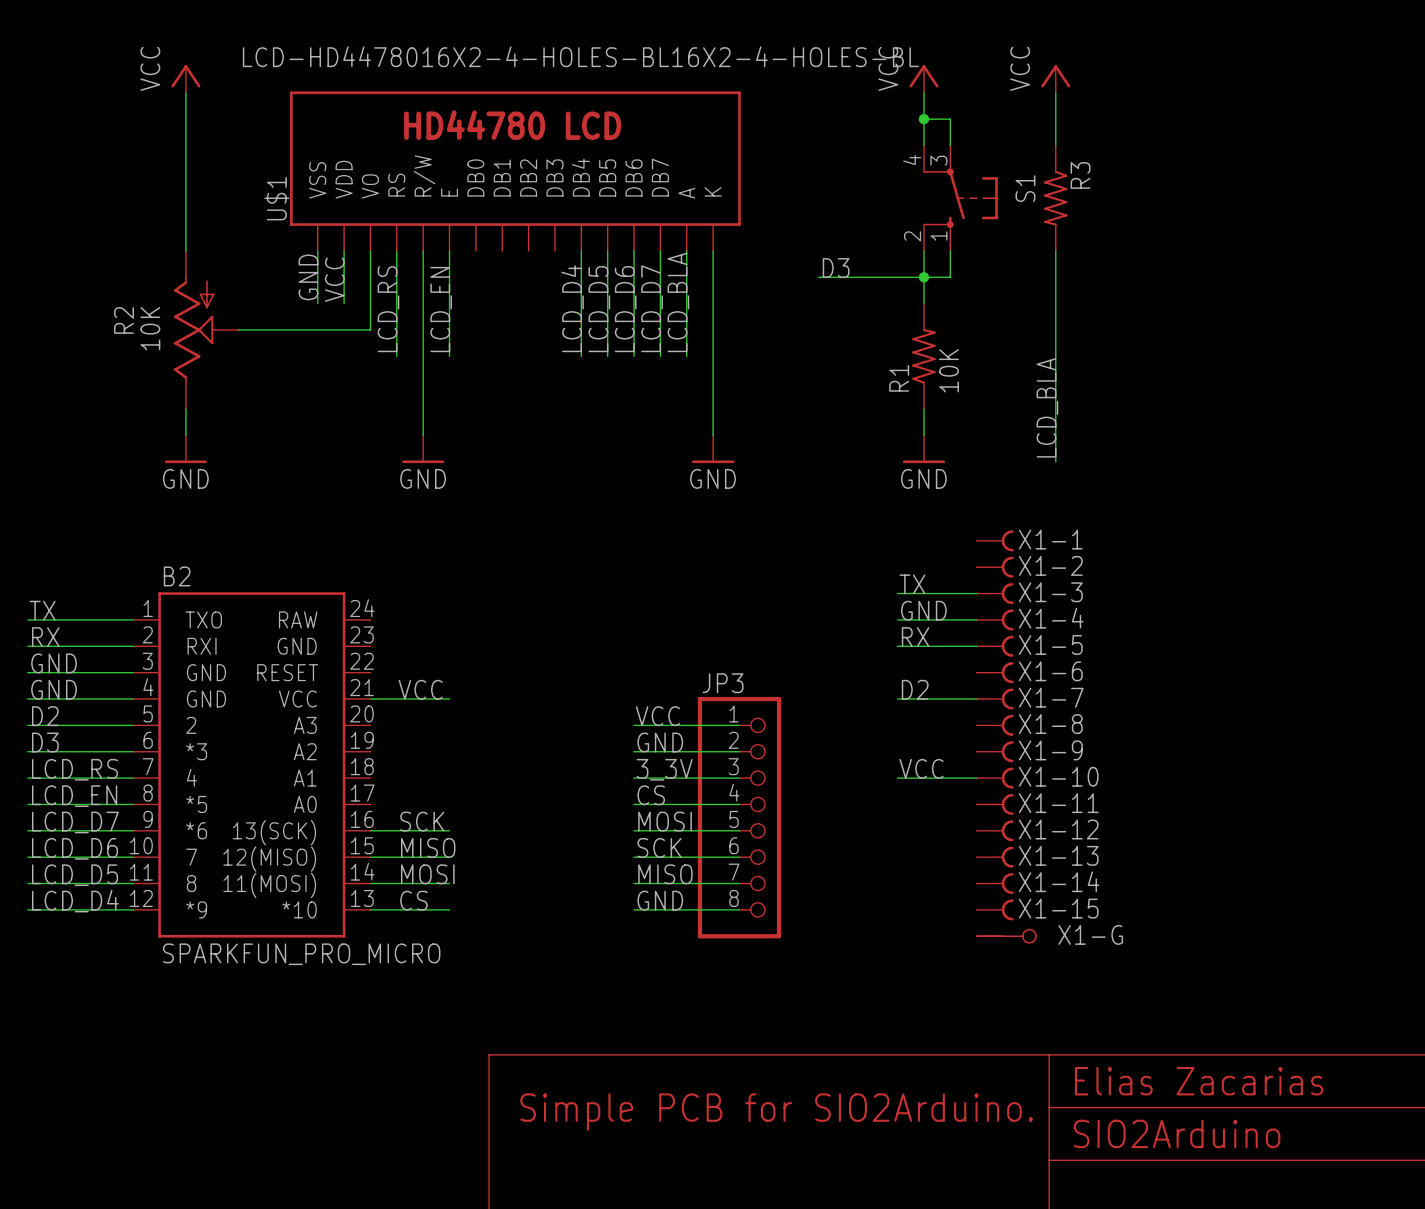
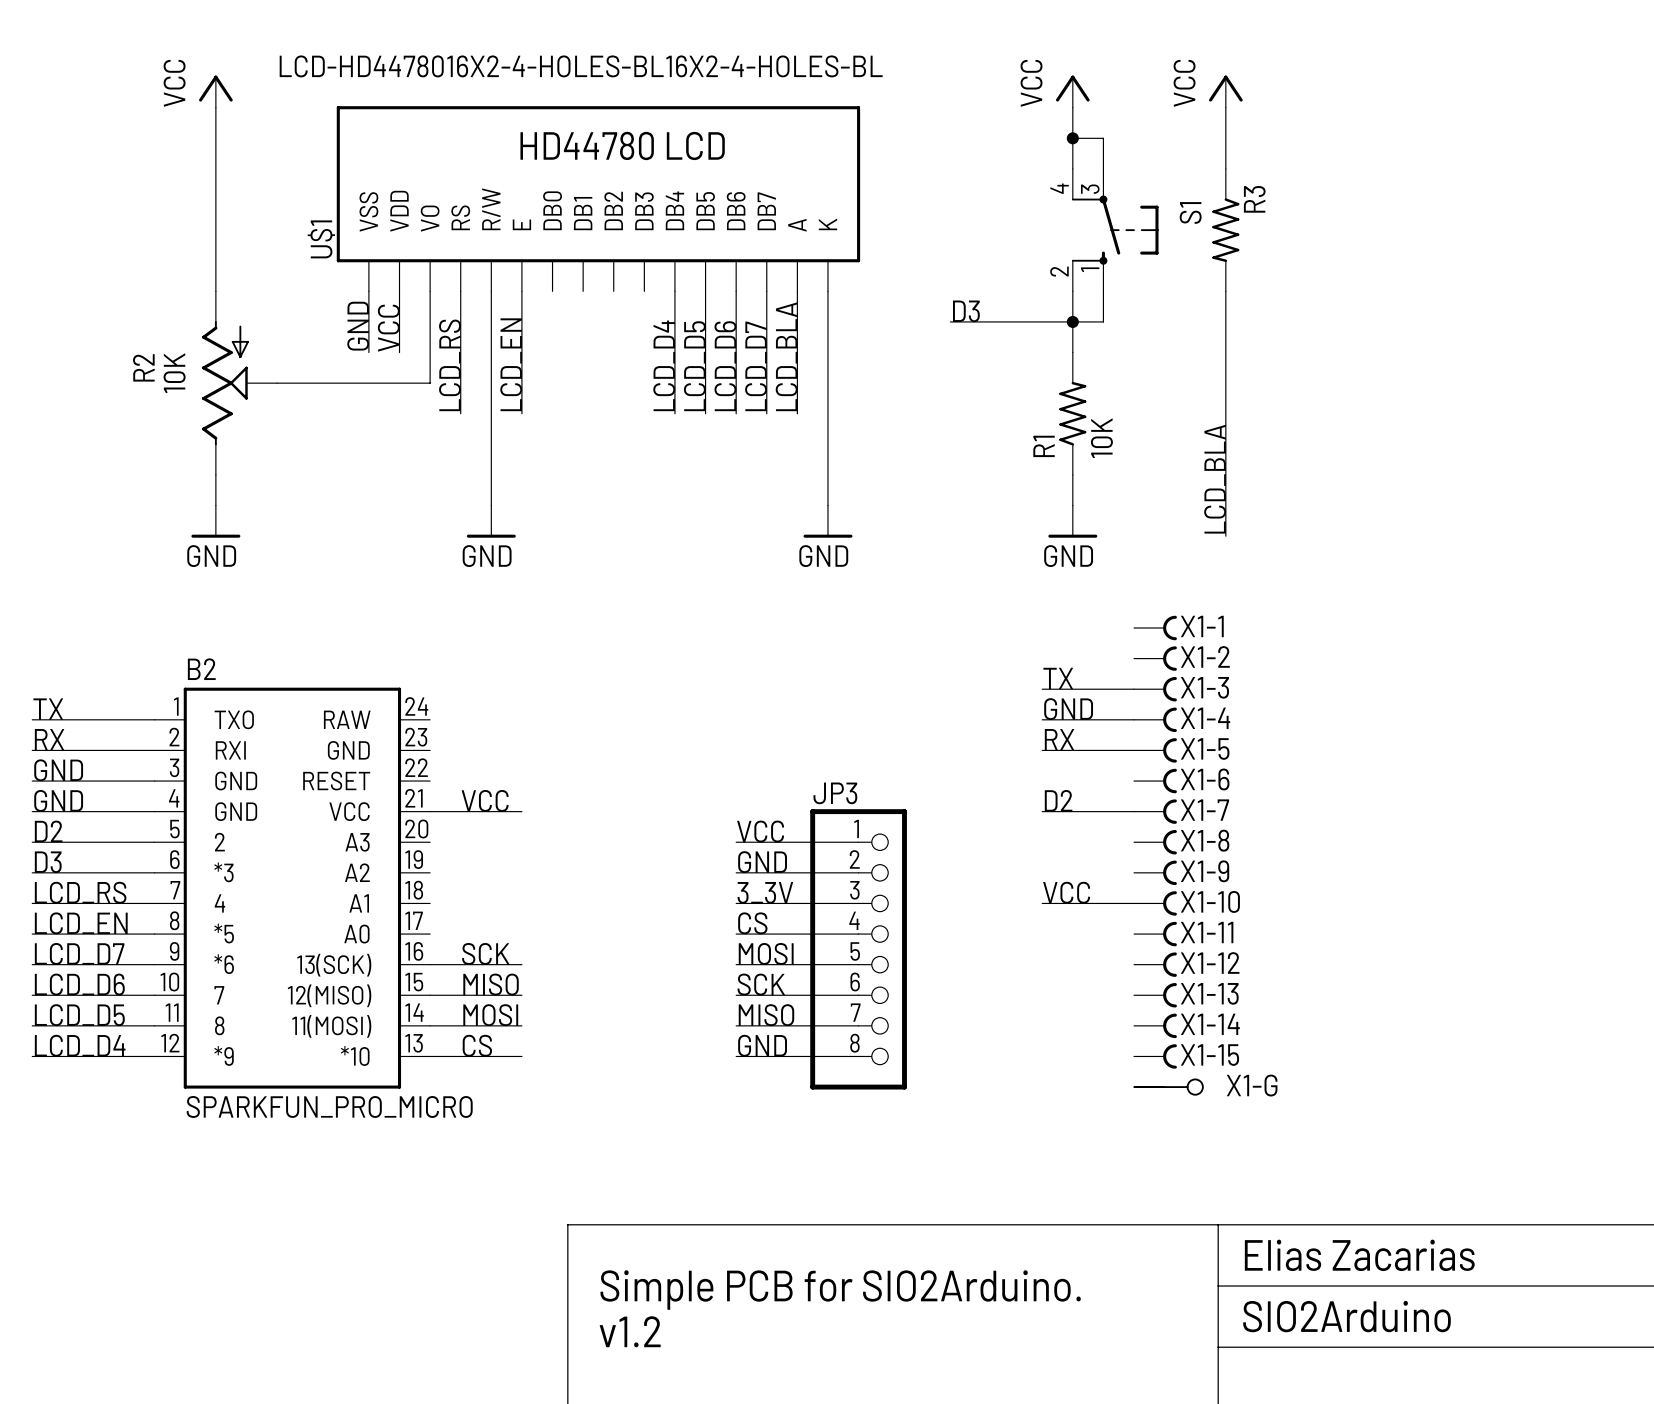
text: none -> v1.2 (630, 1331)

